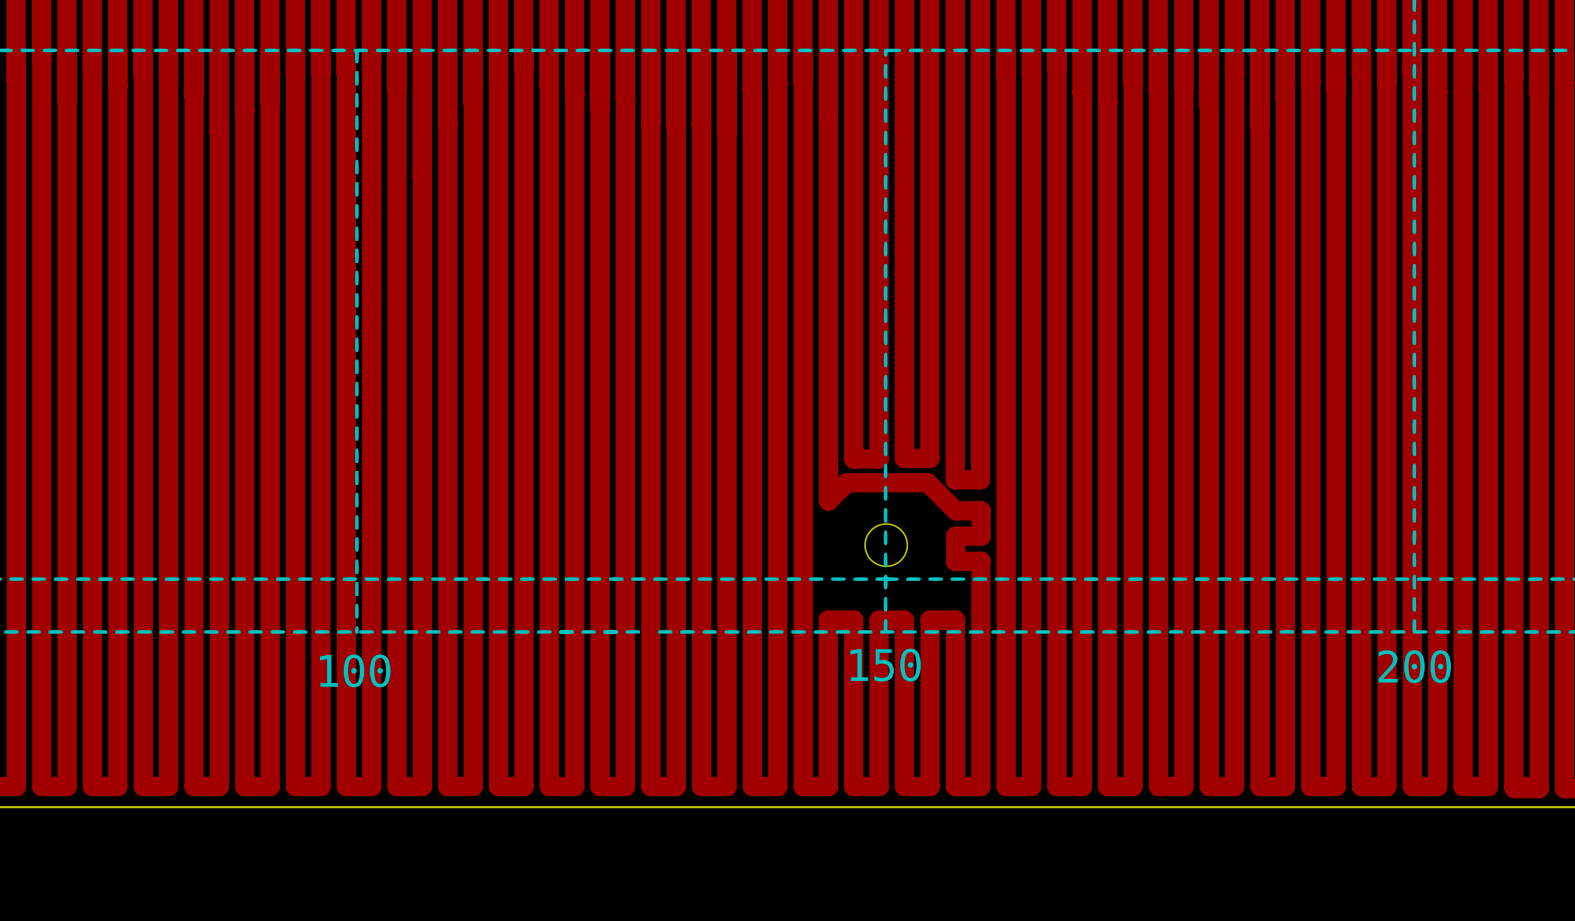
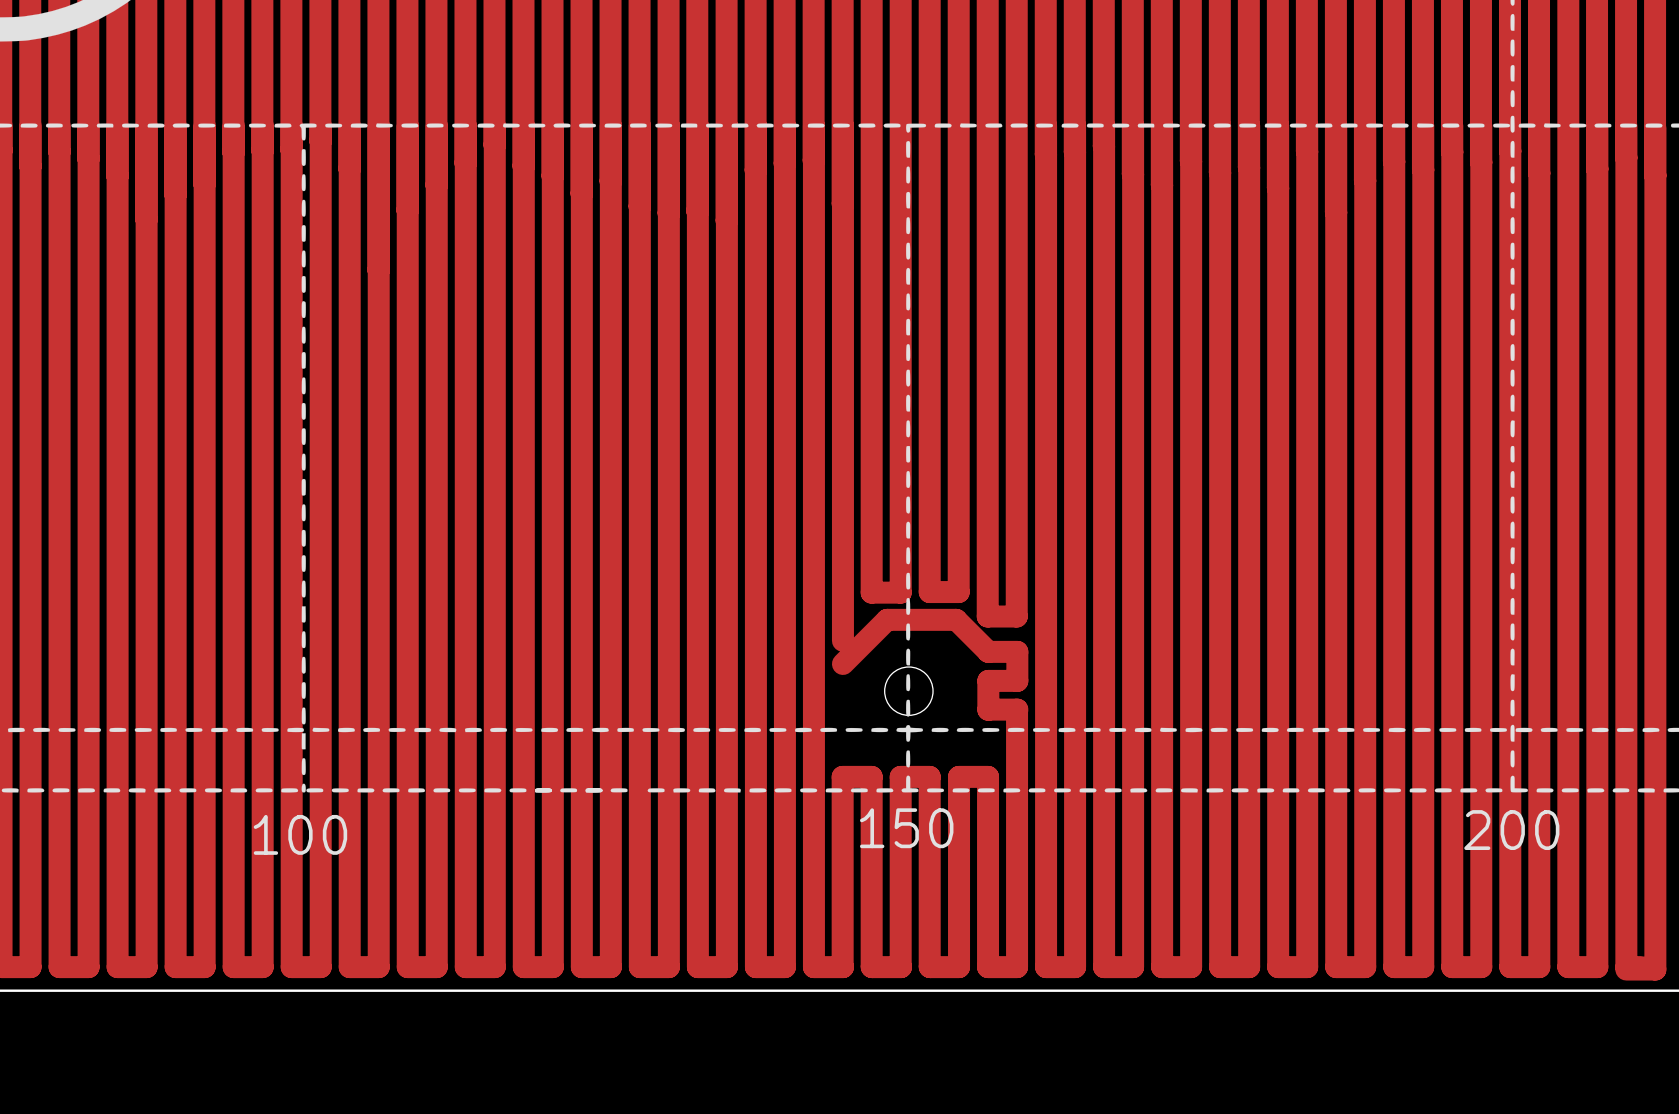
top track: (867, 482) (846, 482) (828, 501) -> (887, 619) (842, 663)

